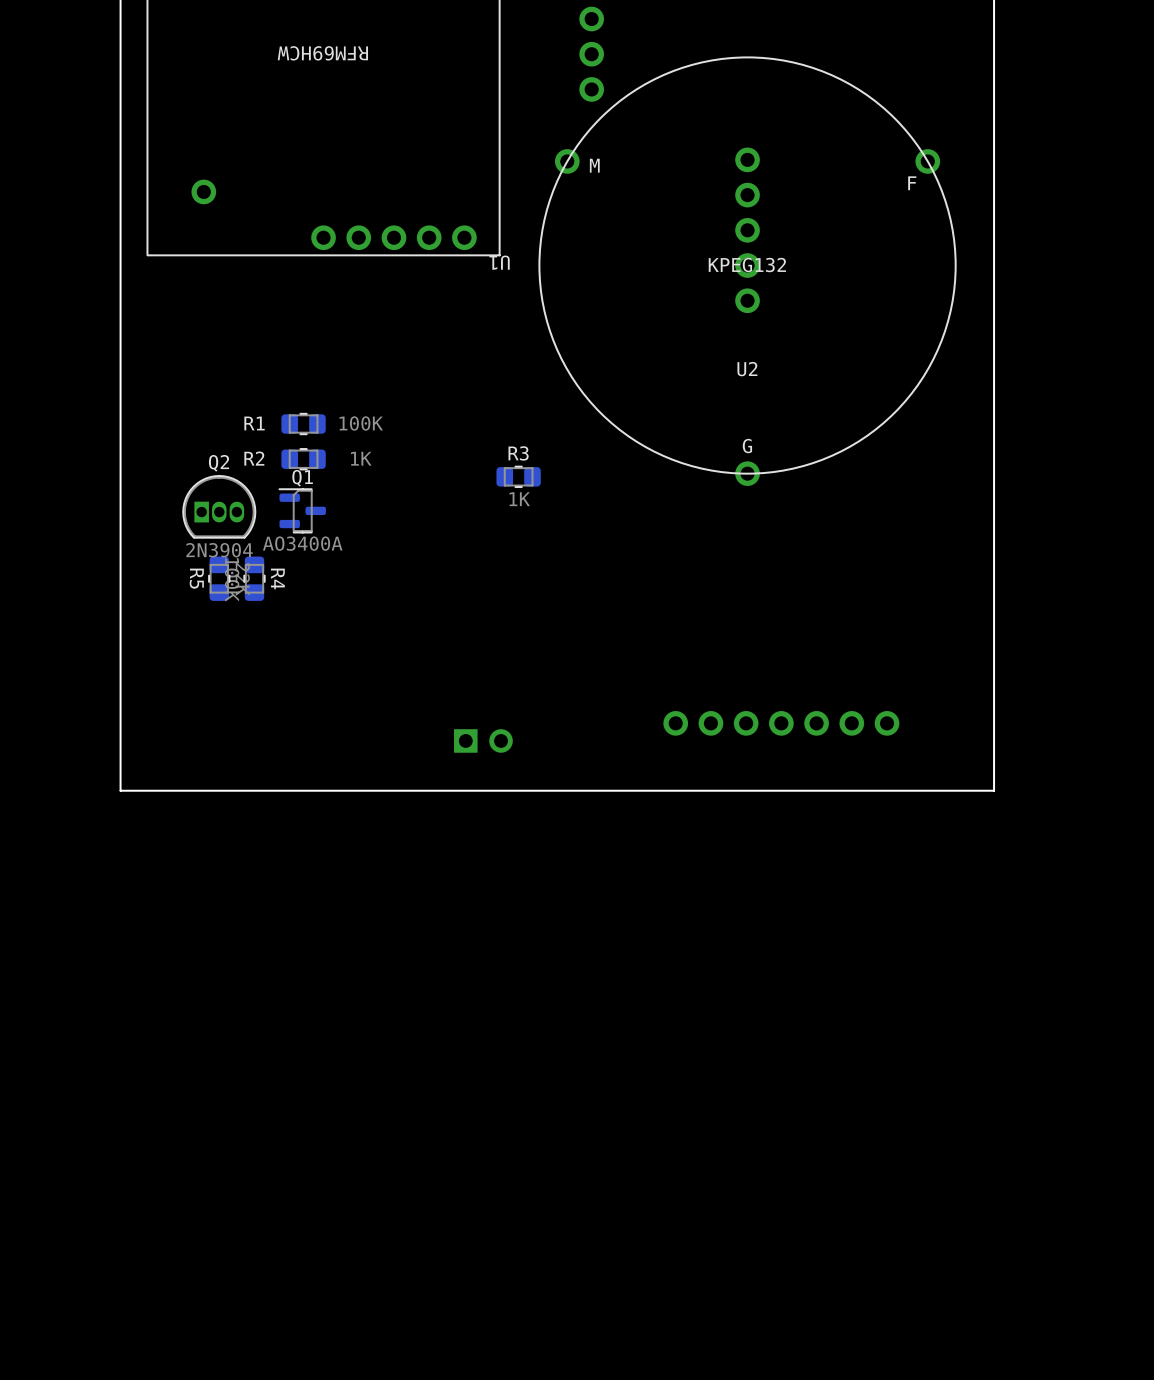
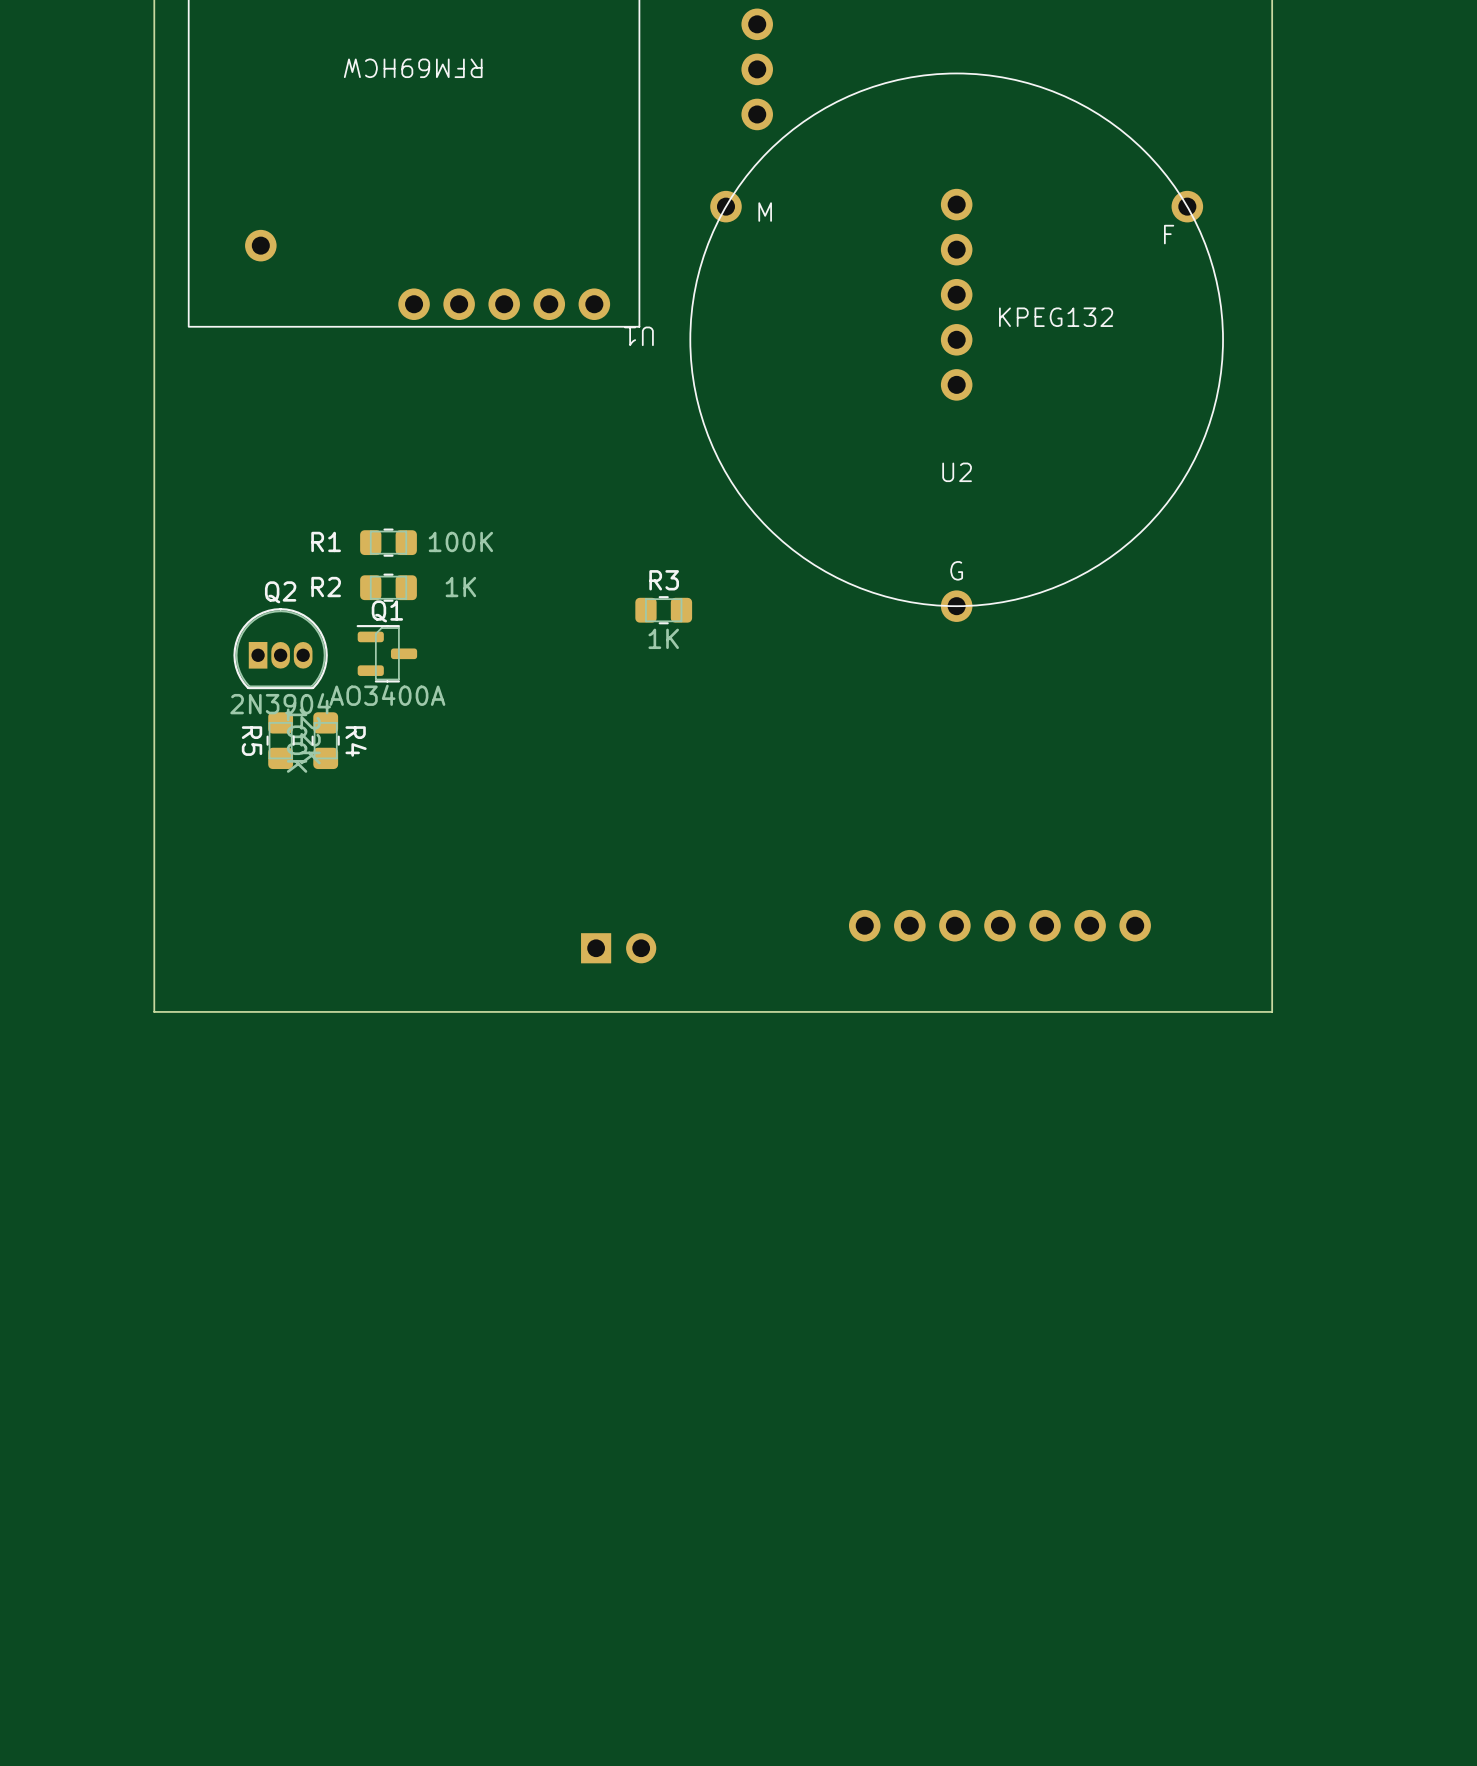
U2 text position: KPEG132 (747, 265) -> KPEG132 (1056, 317)

